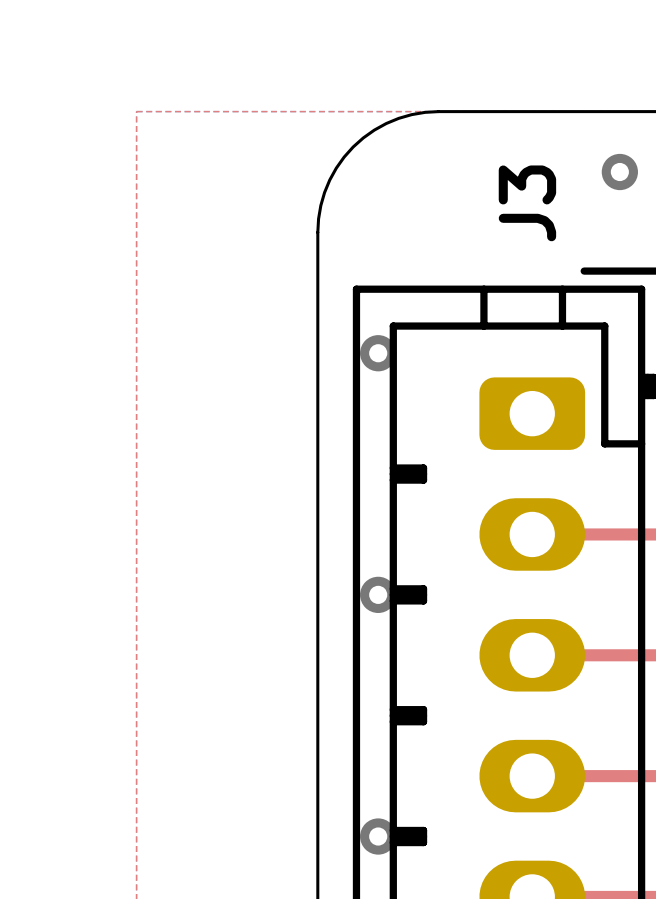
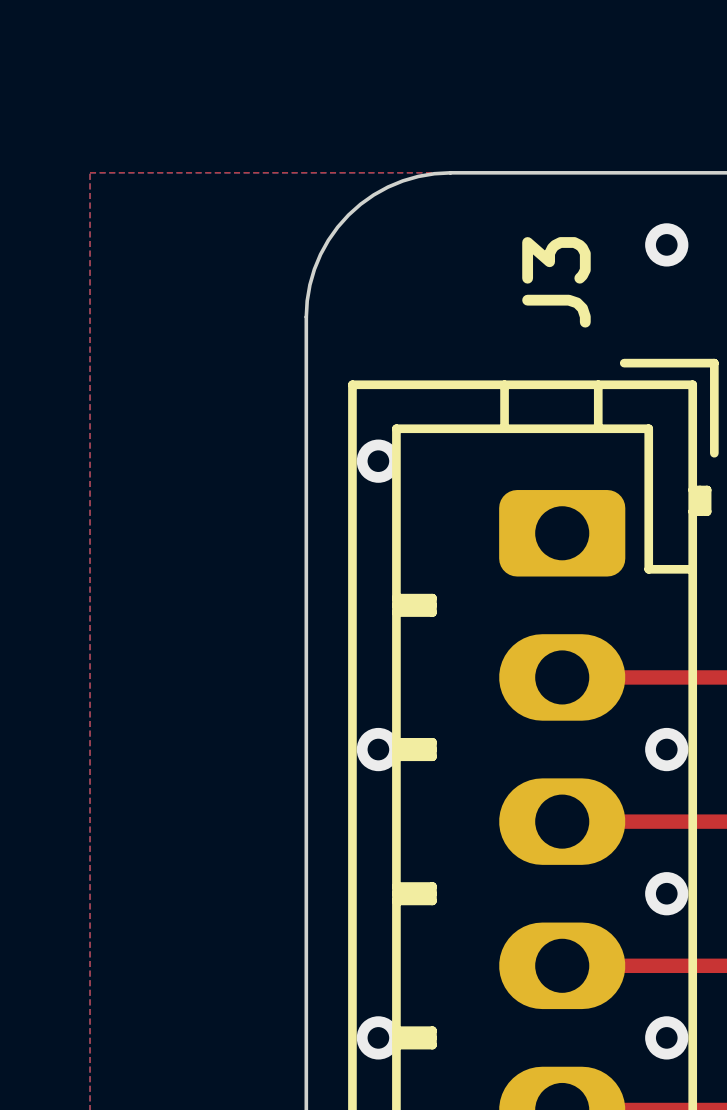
via: none -> (666, 749)
via: none -> (666, 893)
via: none -> (666, 1037)

